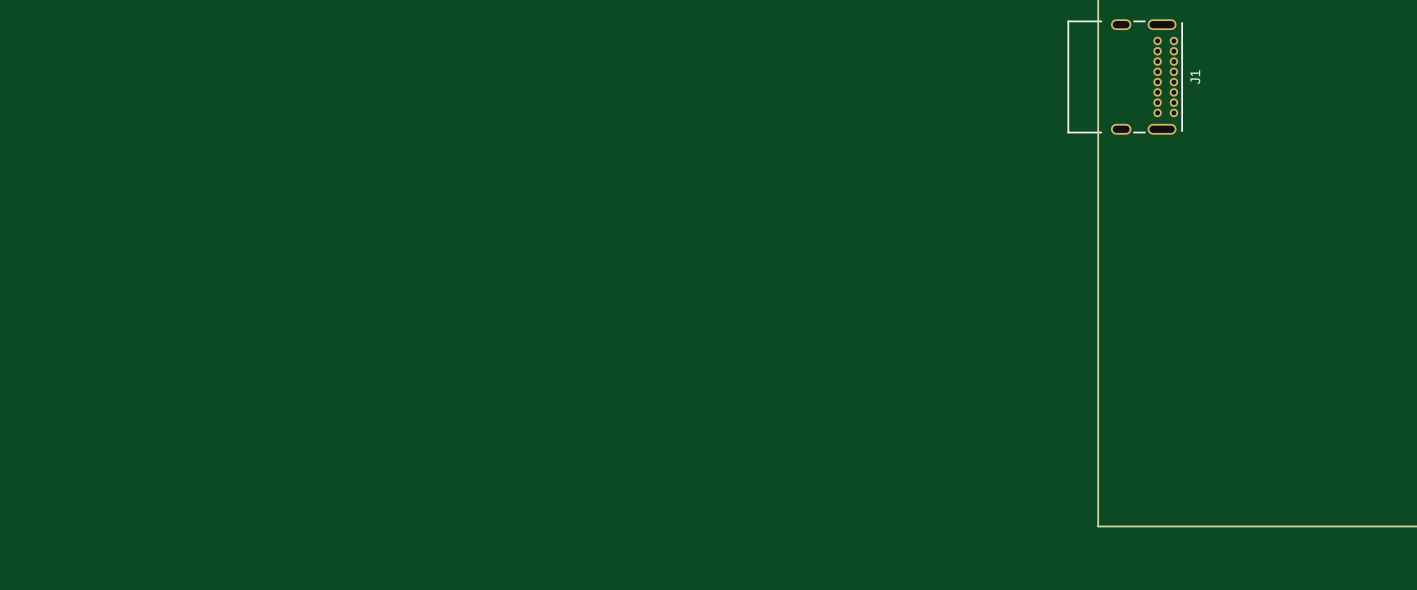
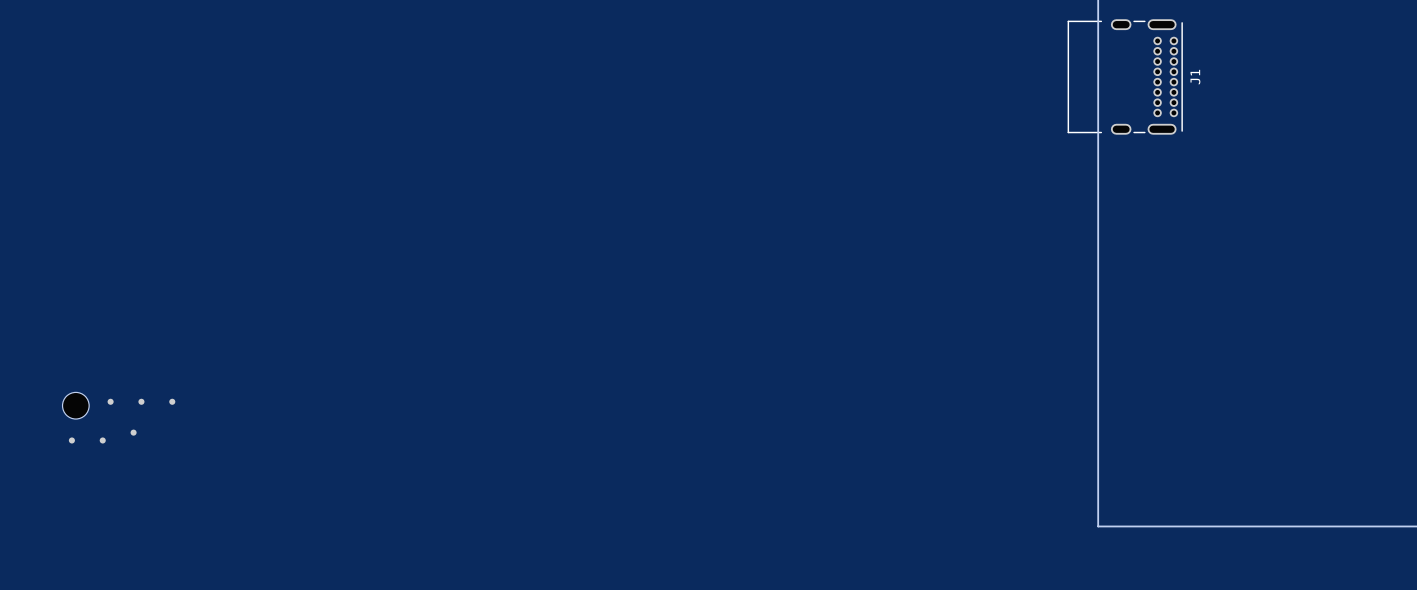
part: none -> (110, 401)
part: none -> (141, 401)
part: none -> (172, 401)
part: none -> (75, 405)
part: none -> (133, 432)
part: none -> (71, 440)
part: none -> (102, 440)

